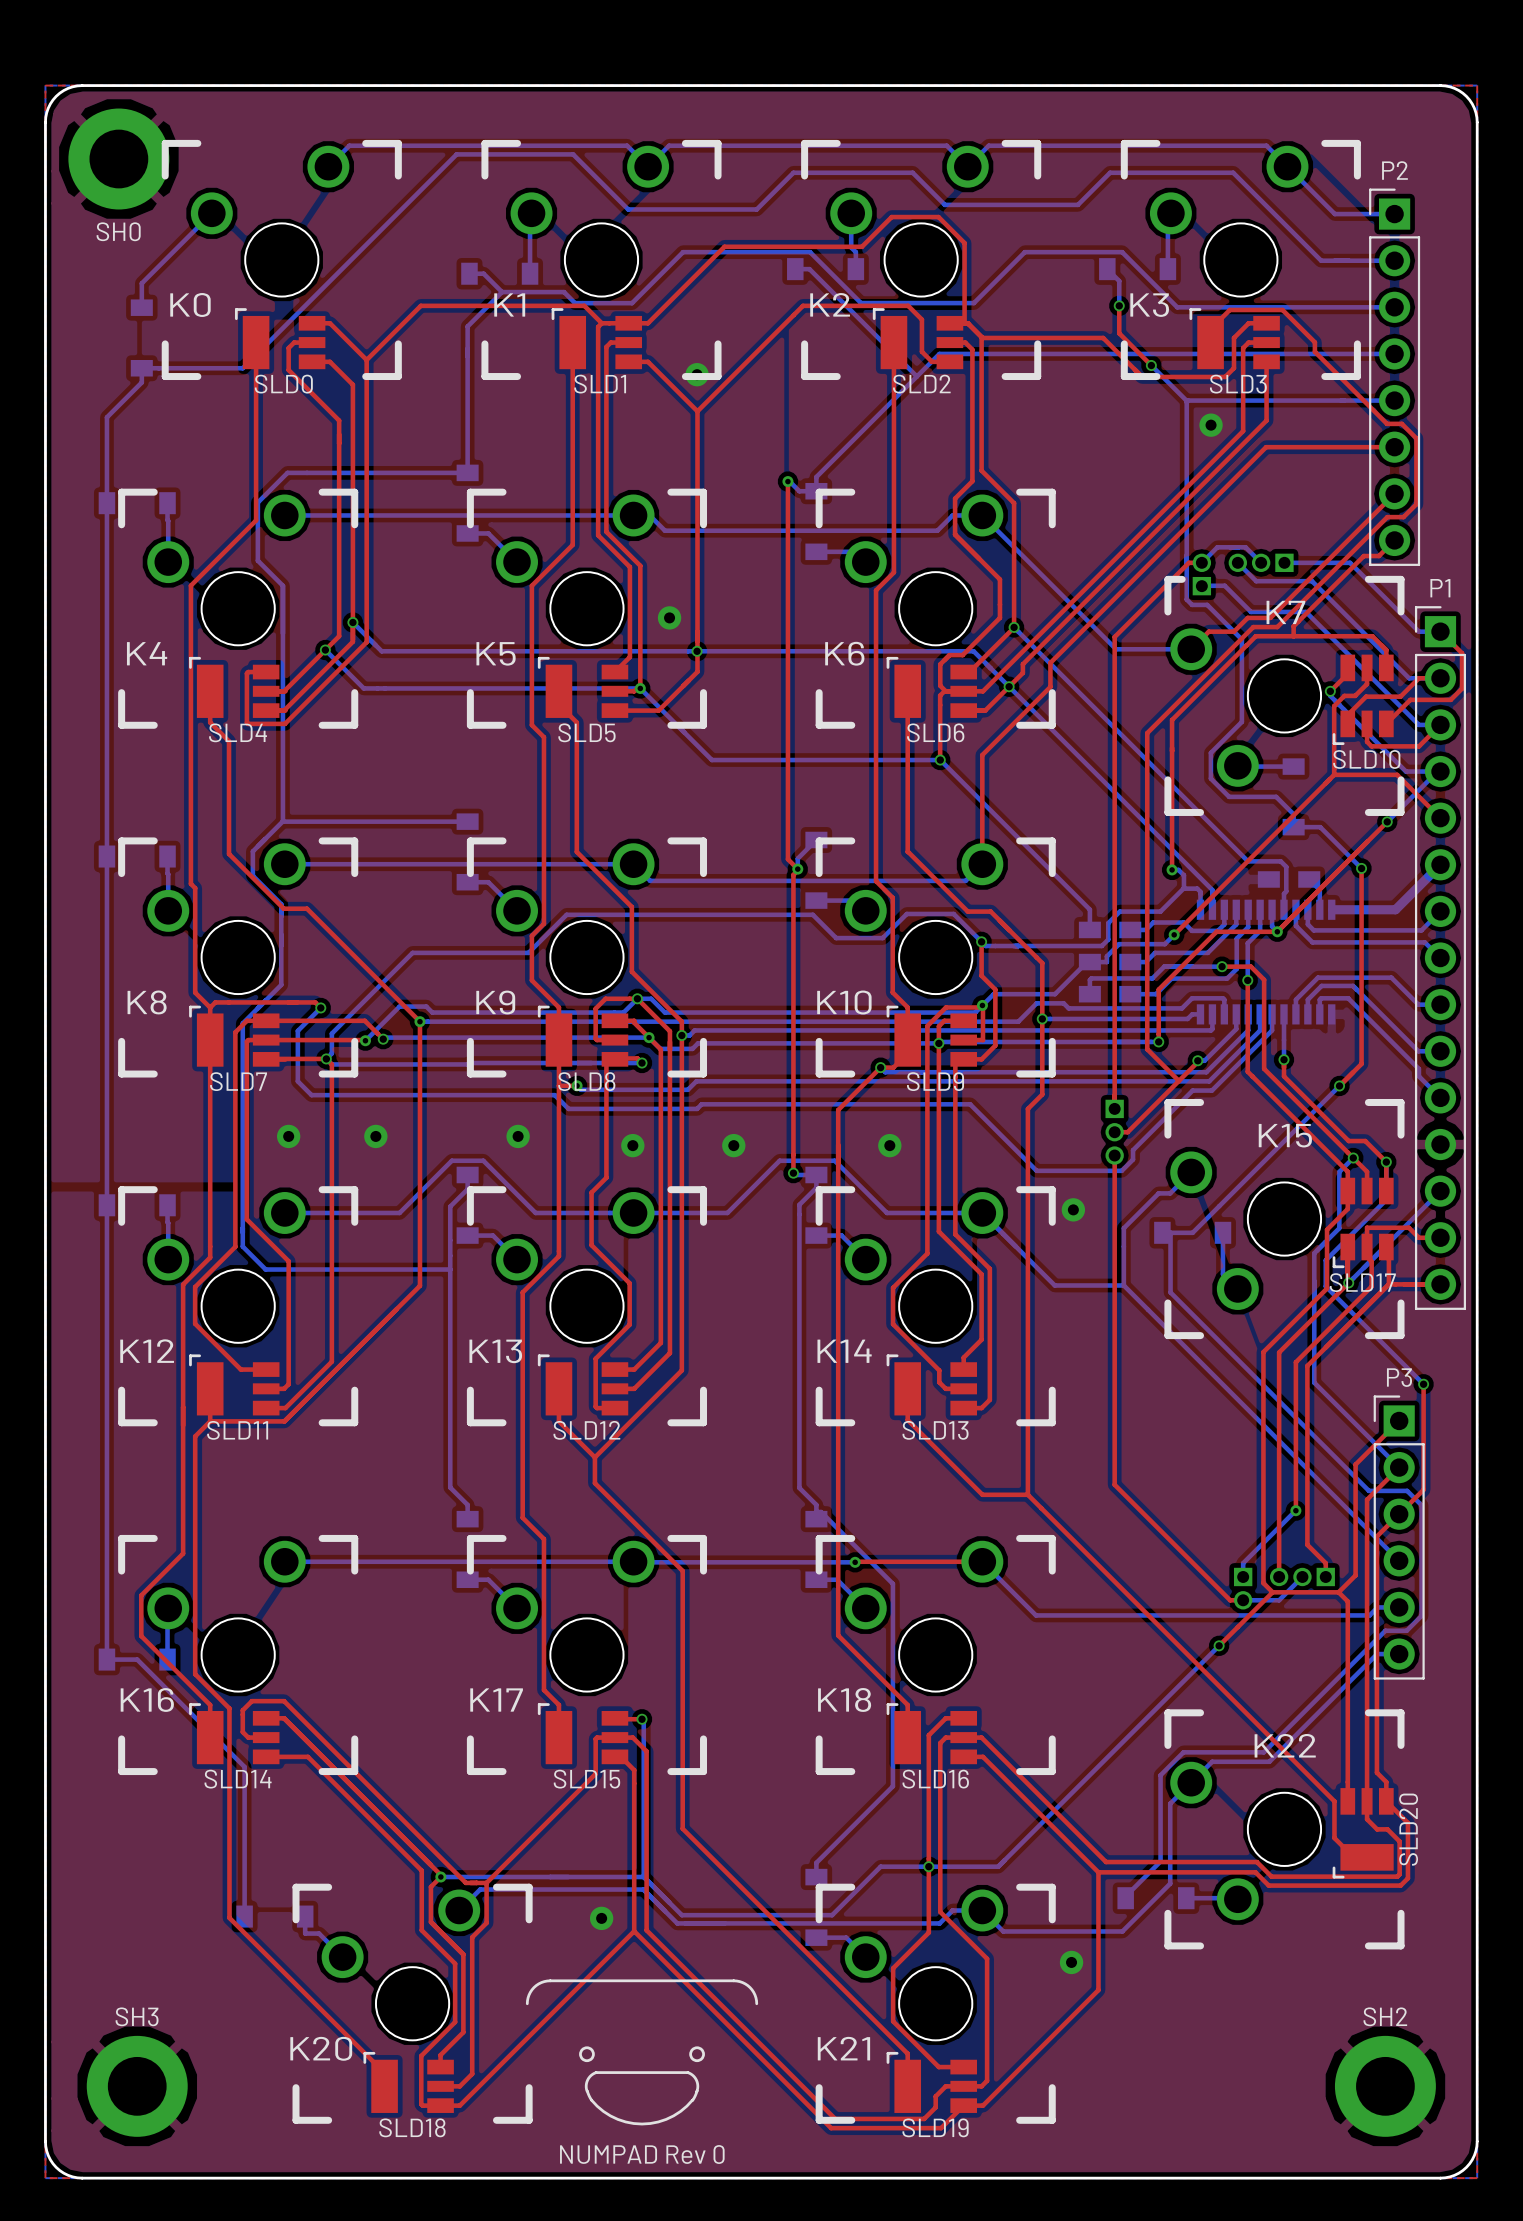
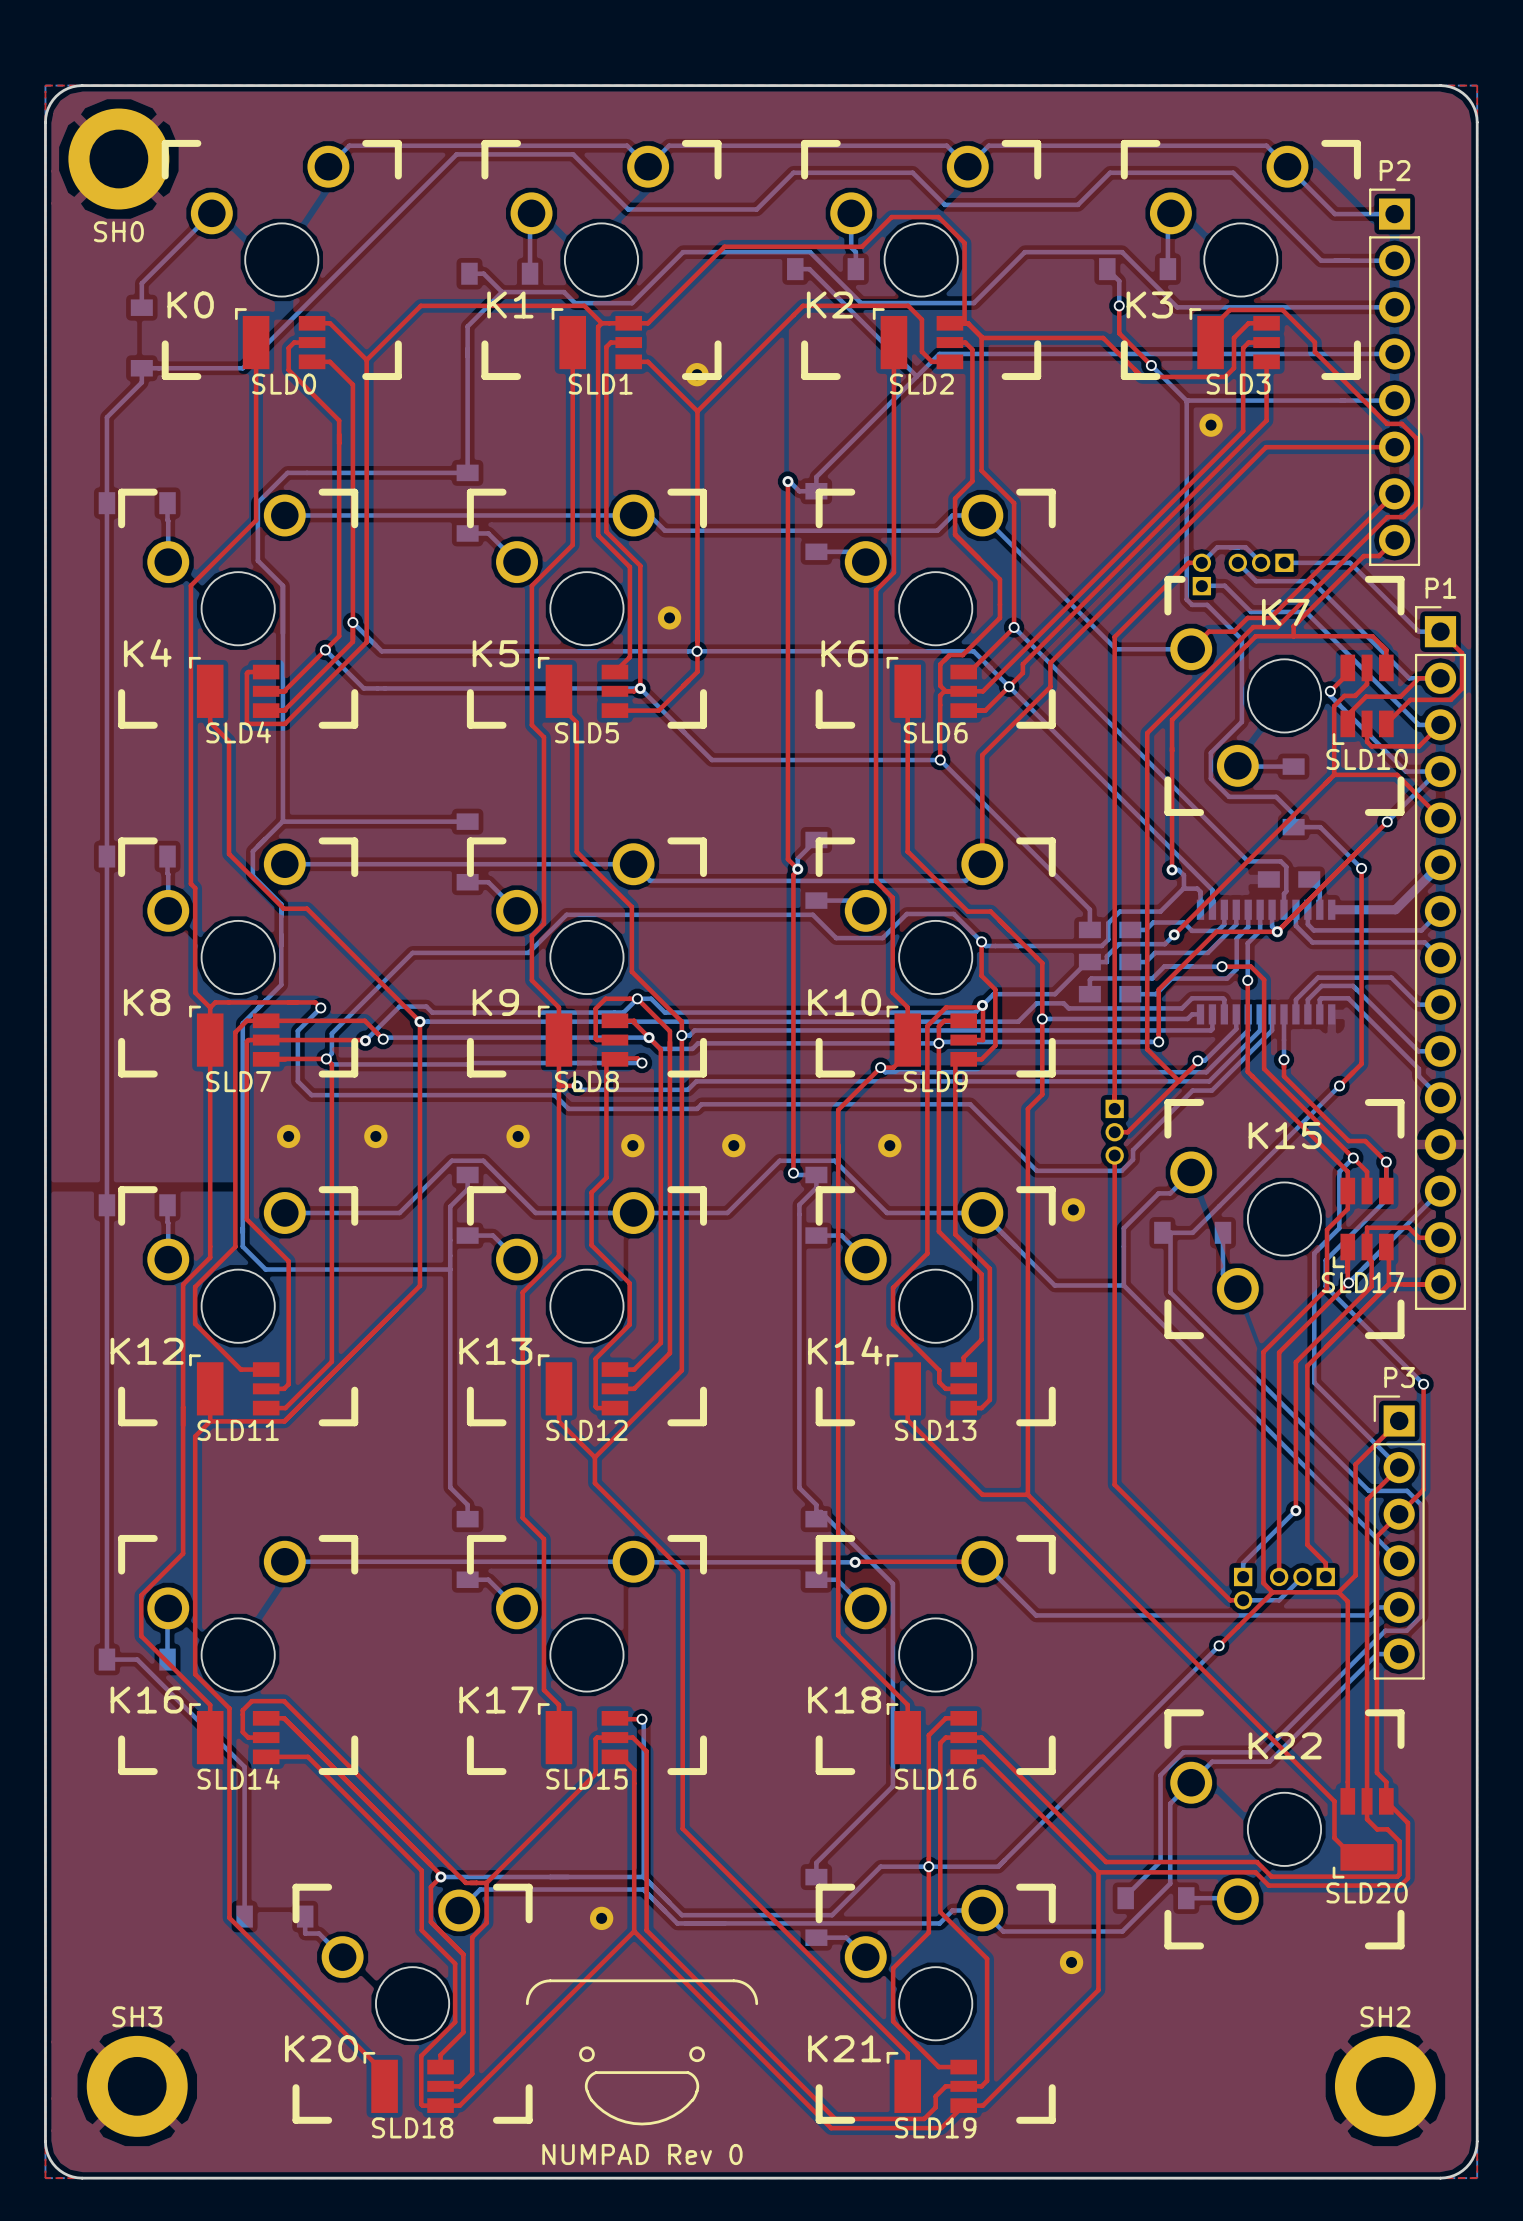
SLD20 name rotation: 0° (1408, 1829) -> 90° clockwise (1367, 1892)

